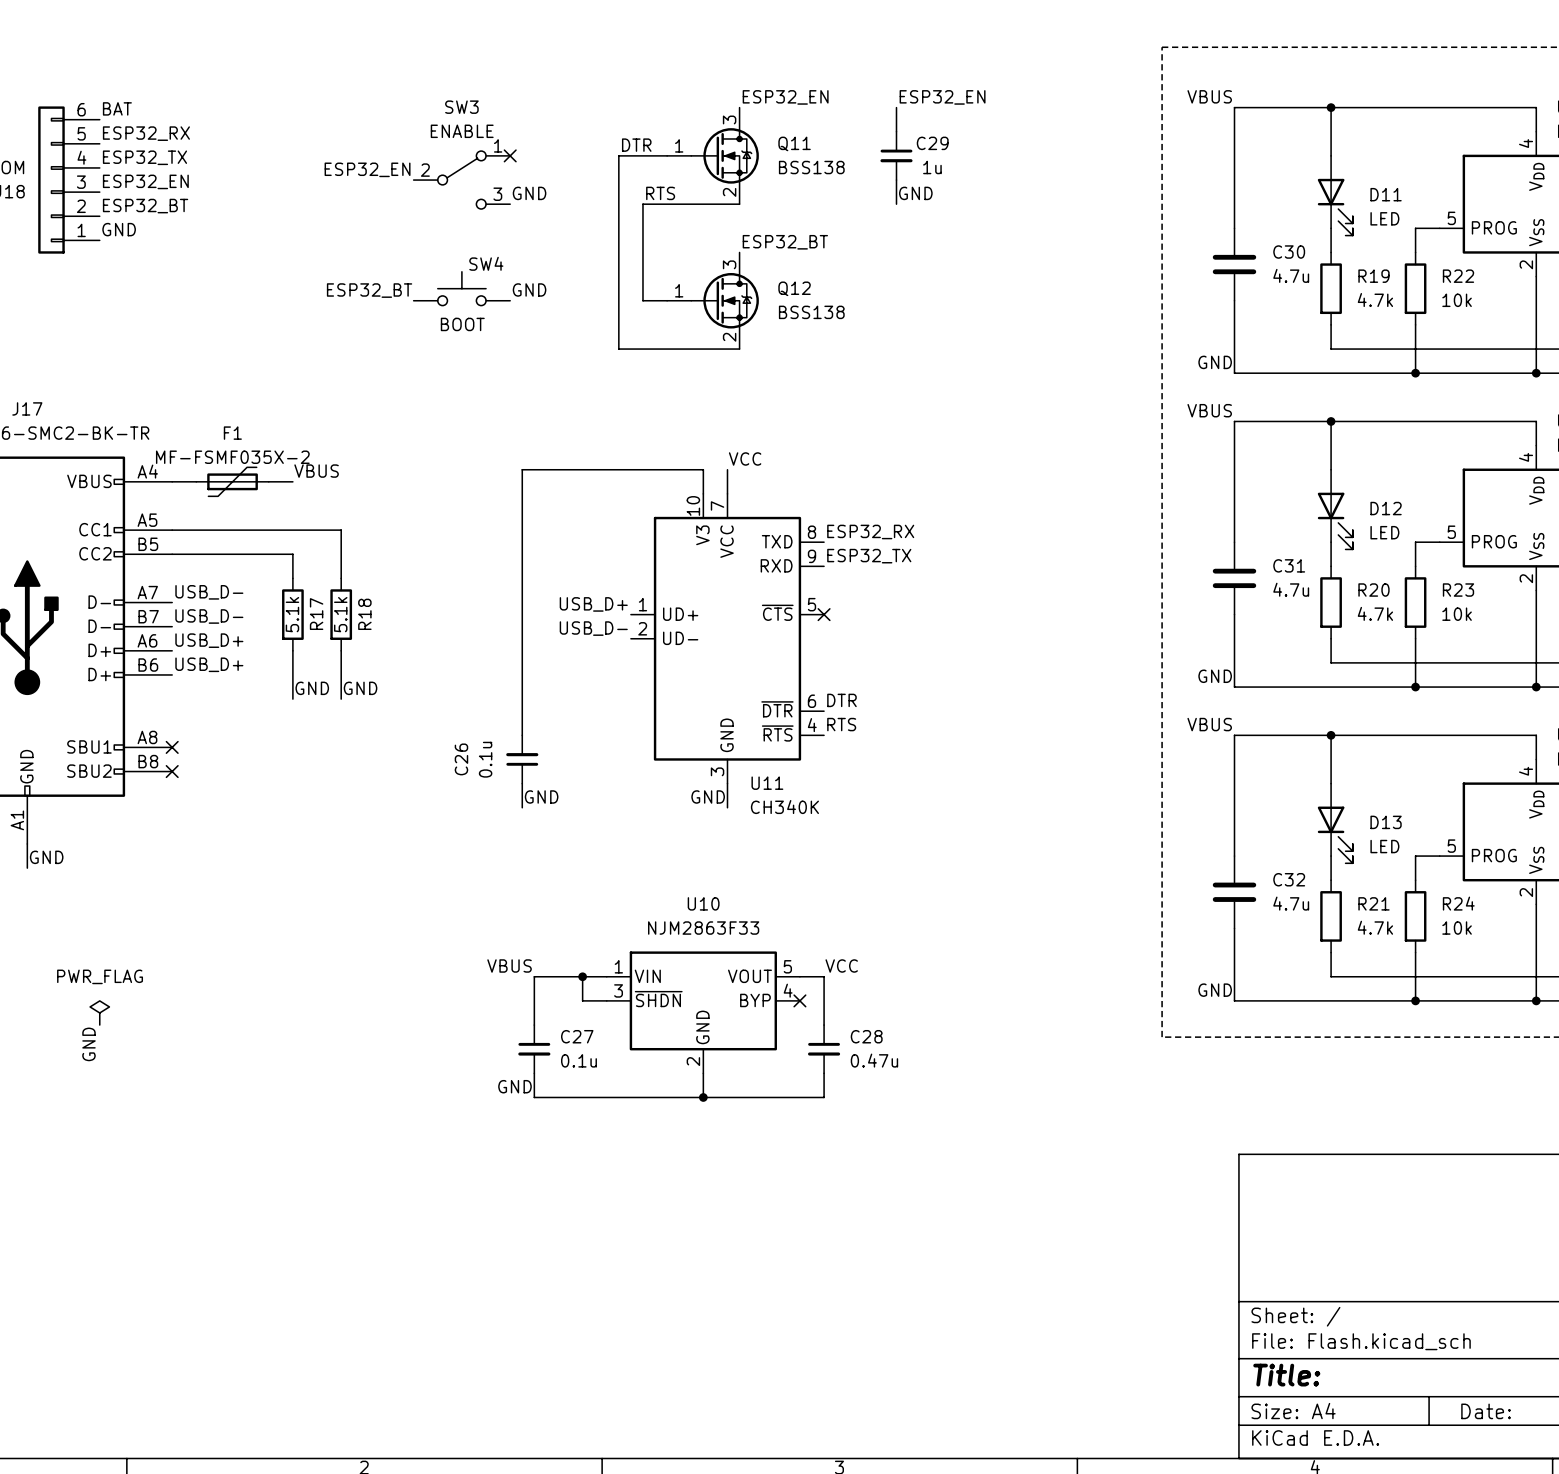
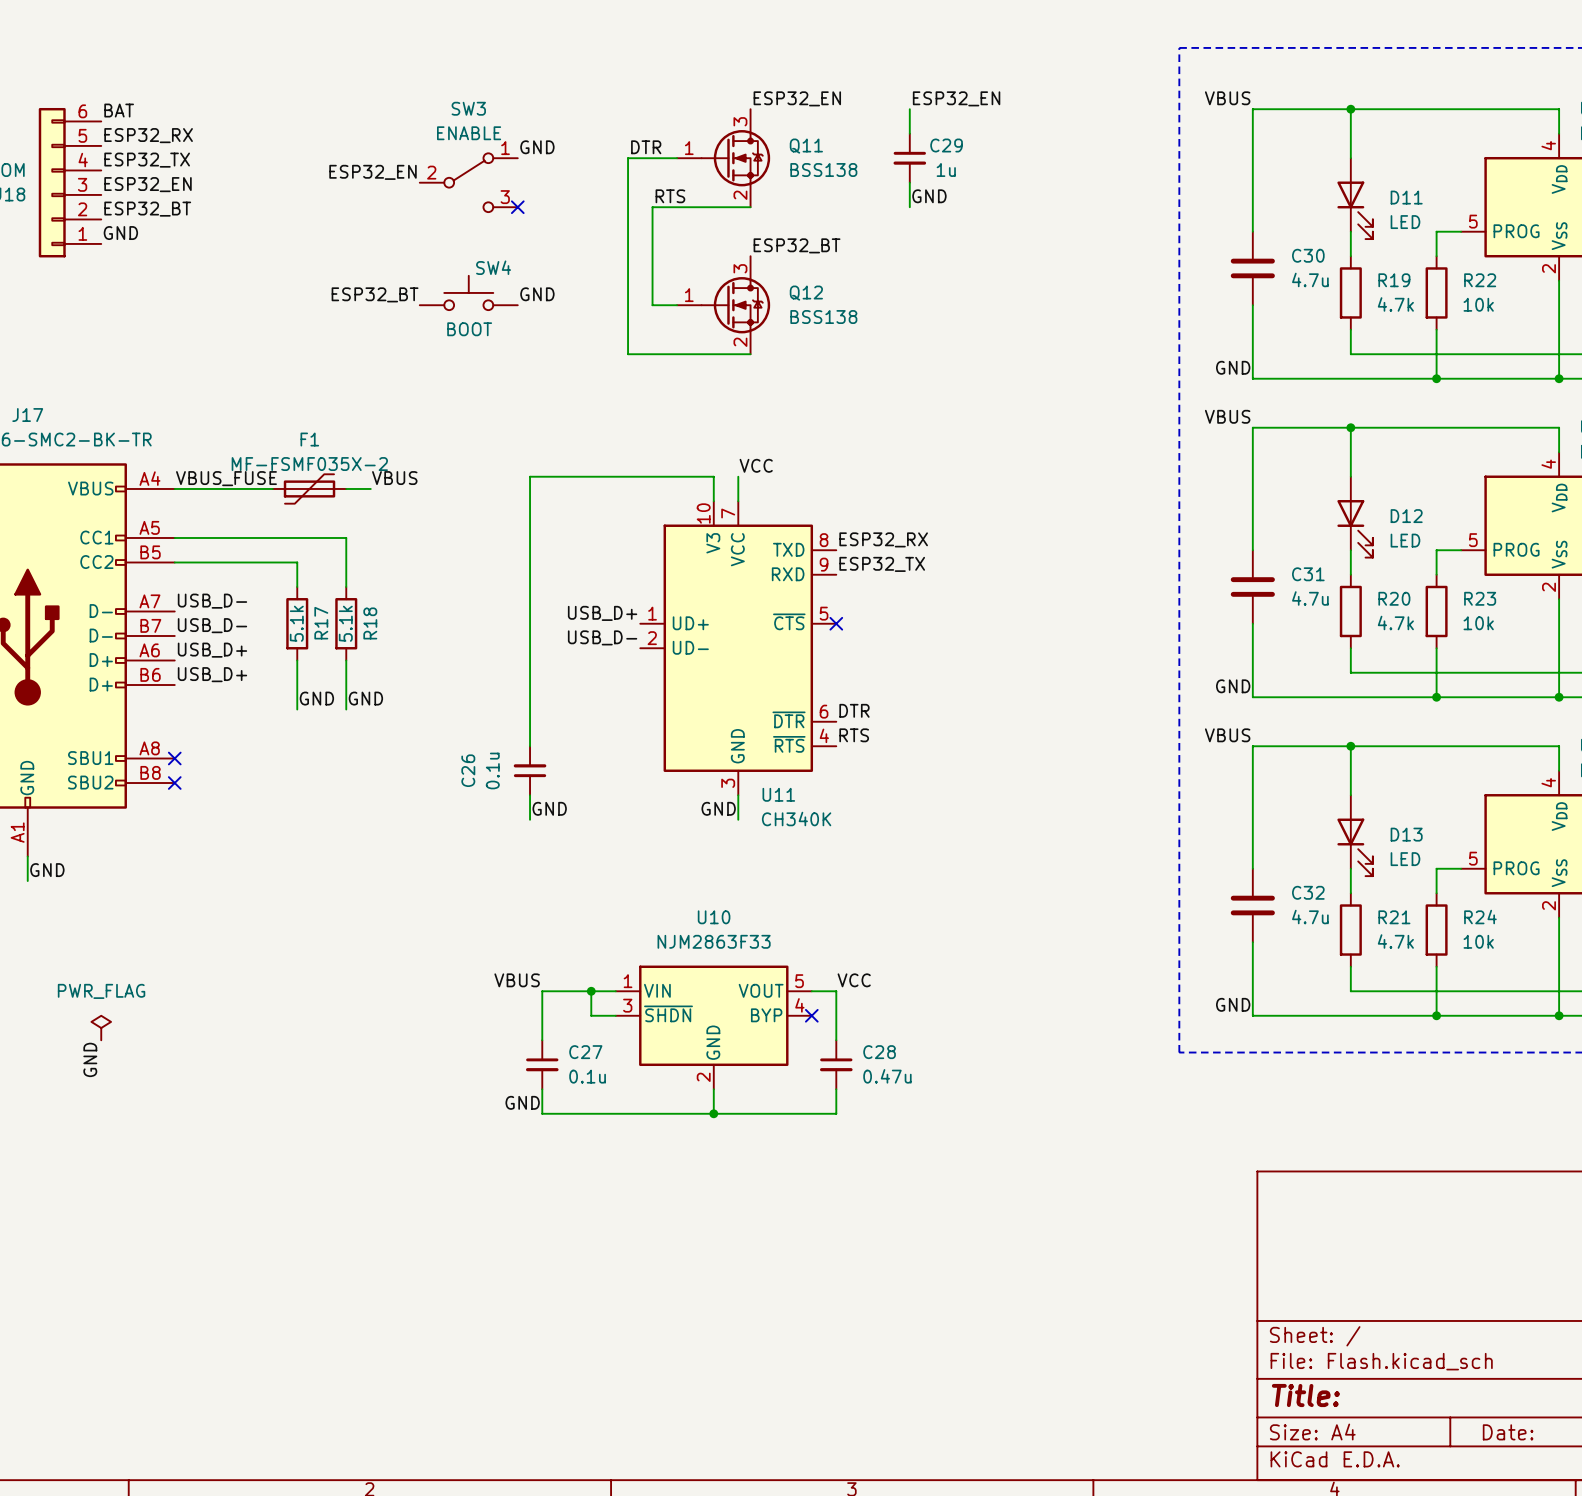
no-connect mark position: (510, 155) -> (517, 207)
label position: GND (529, 193) -> GND (537, 147)
label: none -> VBUS_FUSE (226, 478)
label position: VBUS (316, 471) -> VBUS (394, 478)
F1 position: (232, 481) -> (309, 488)
wire: none -> (346, 488) (370, 488)

